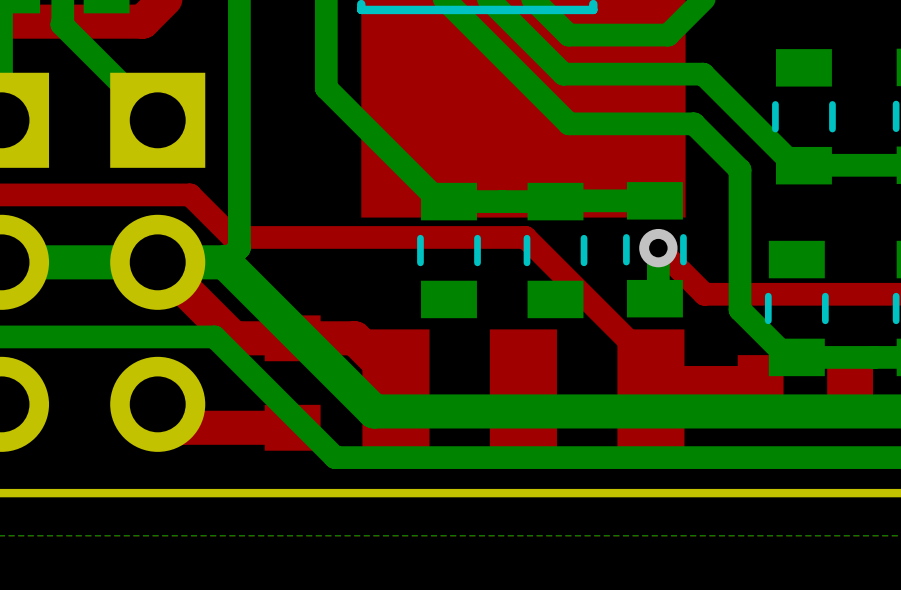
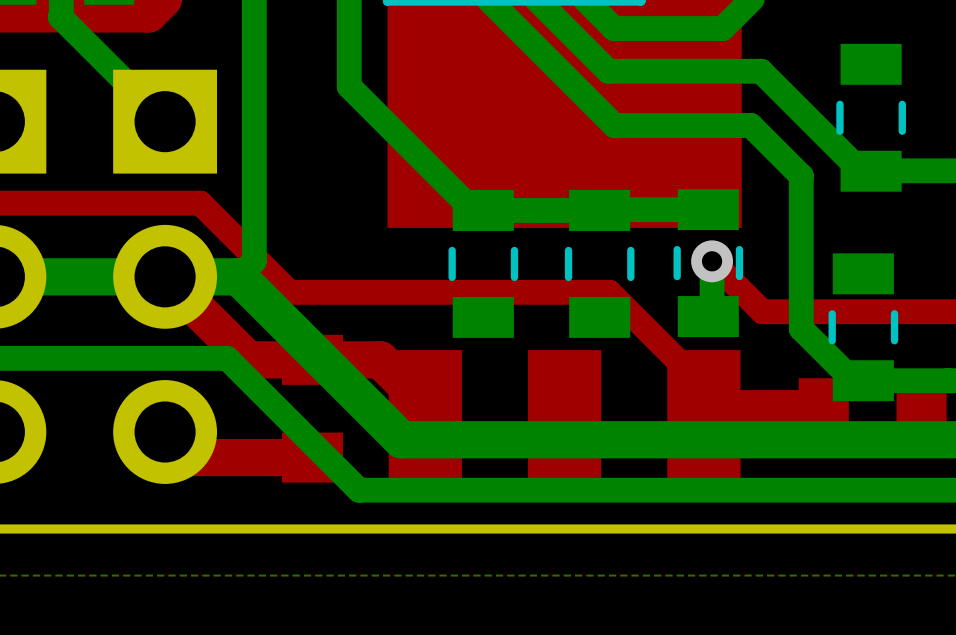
top track: (232, 237) (525, 237) (564, 276) -> (246, 249) (289, 292) (609, 292)

